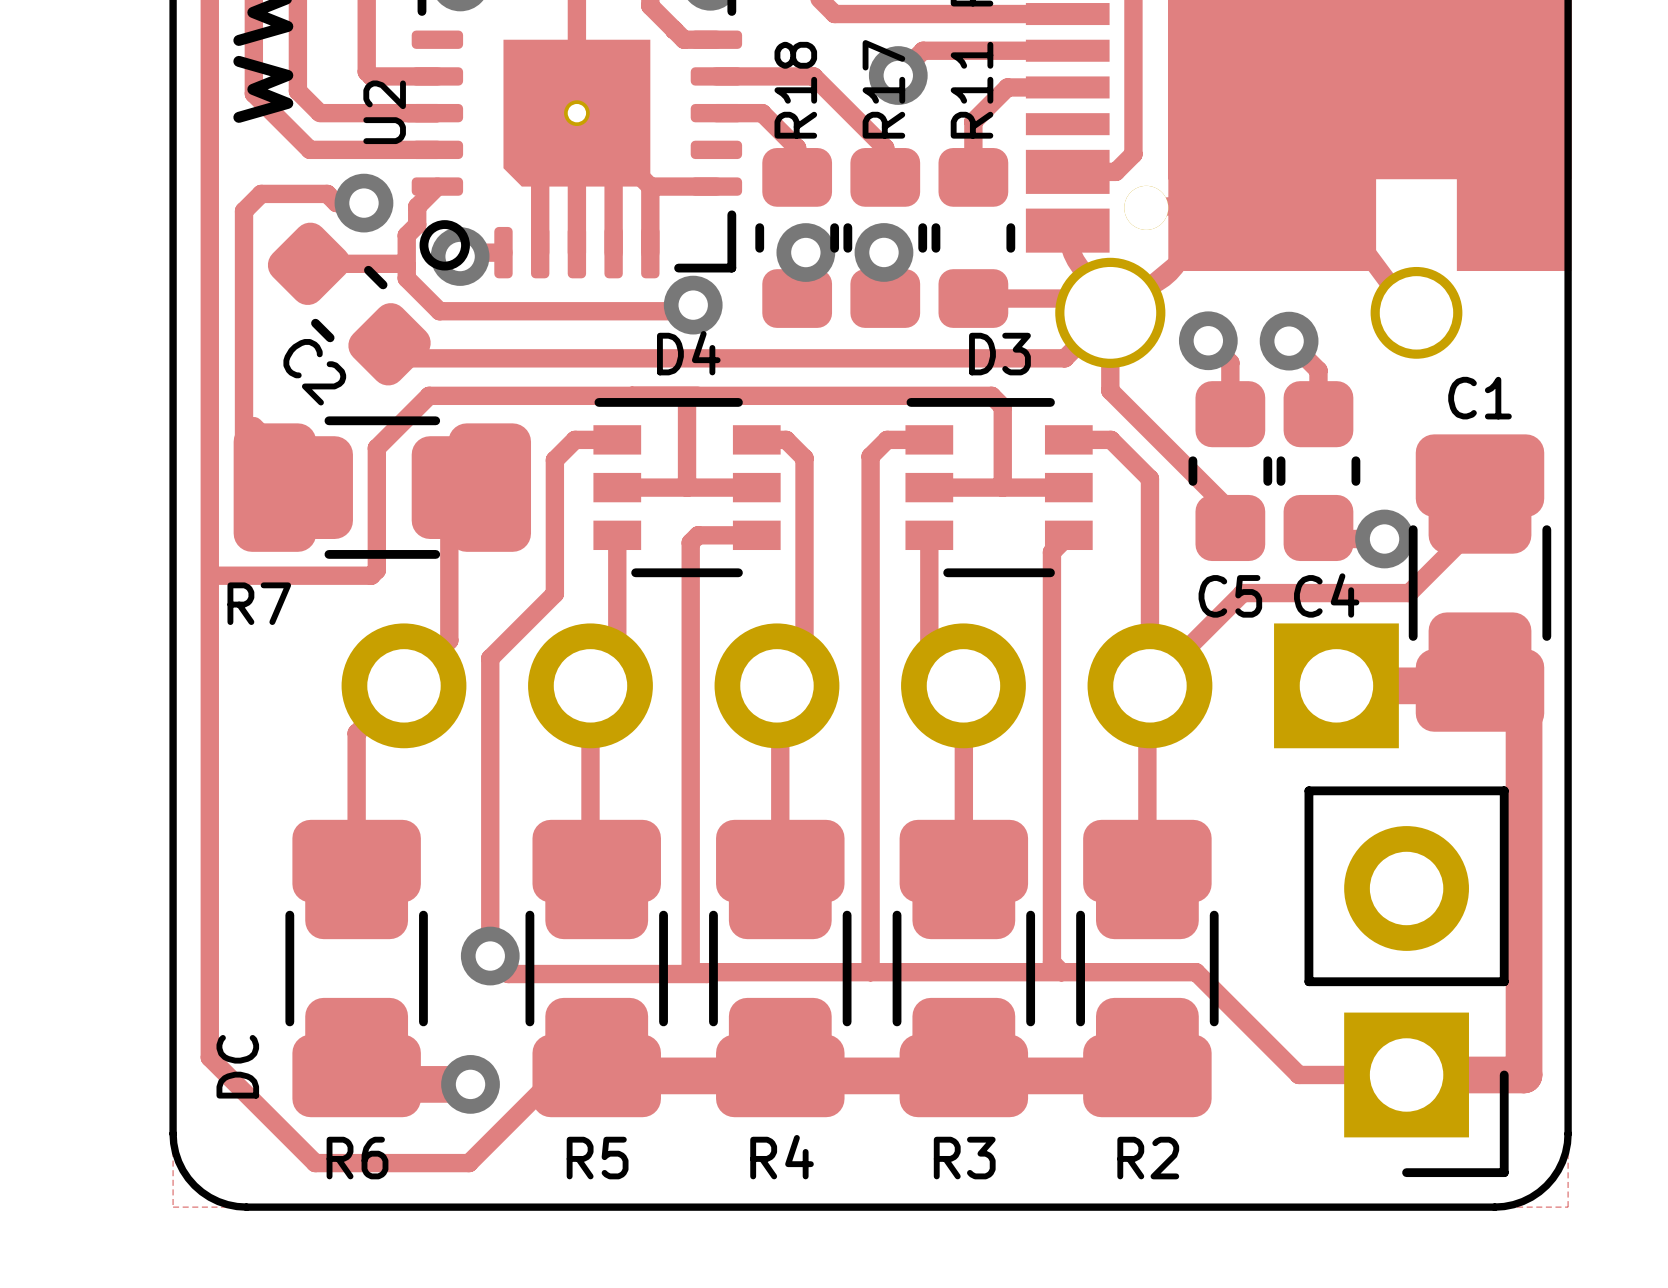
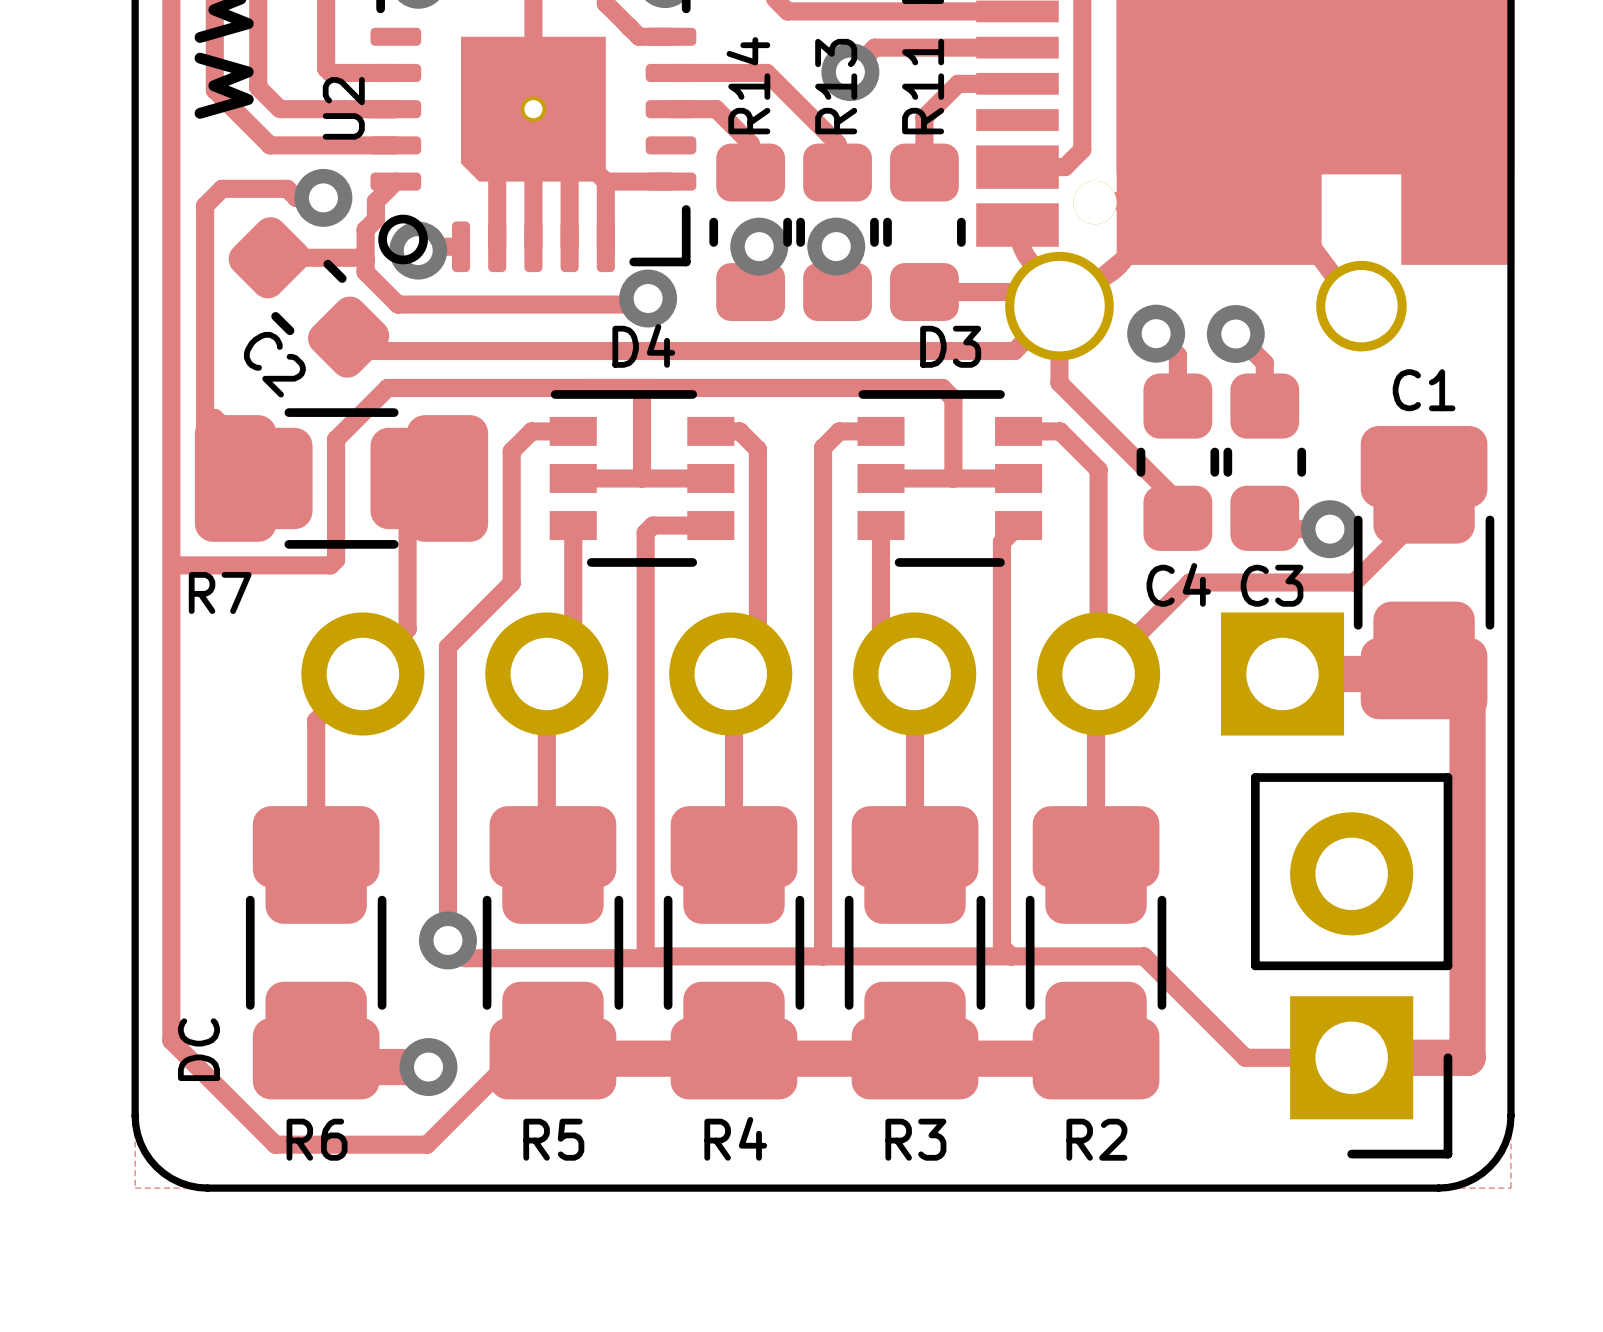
R17 name: R17 (883, 89) -> R13 (836, 86)
R18 name: R18 (795, 90) -> R14 (748, 85)
C4 name: C4 (1326, 595) -> C3 (1272, 585)
C5 name: C5 (1230, 596) -> C4 (1178, 584)

